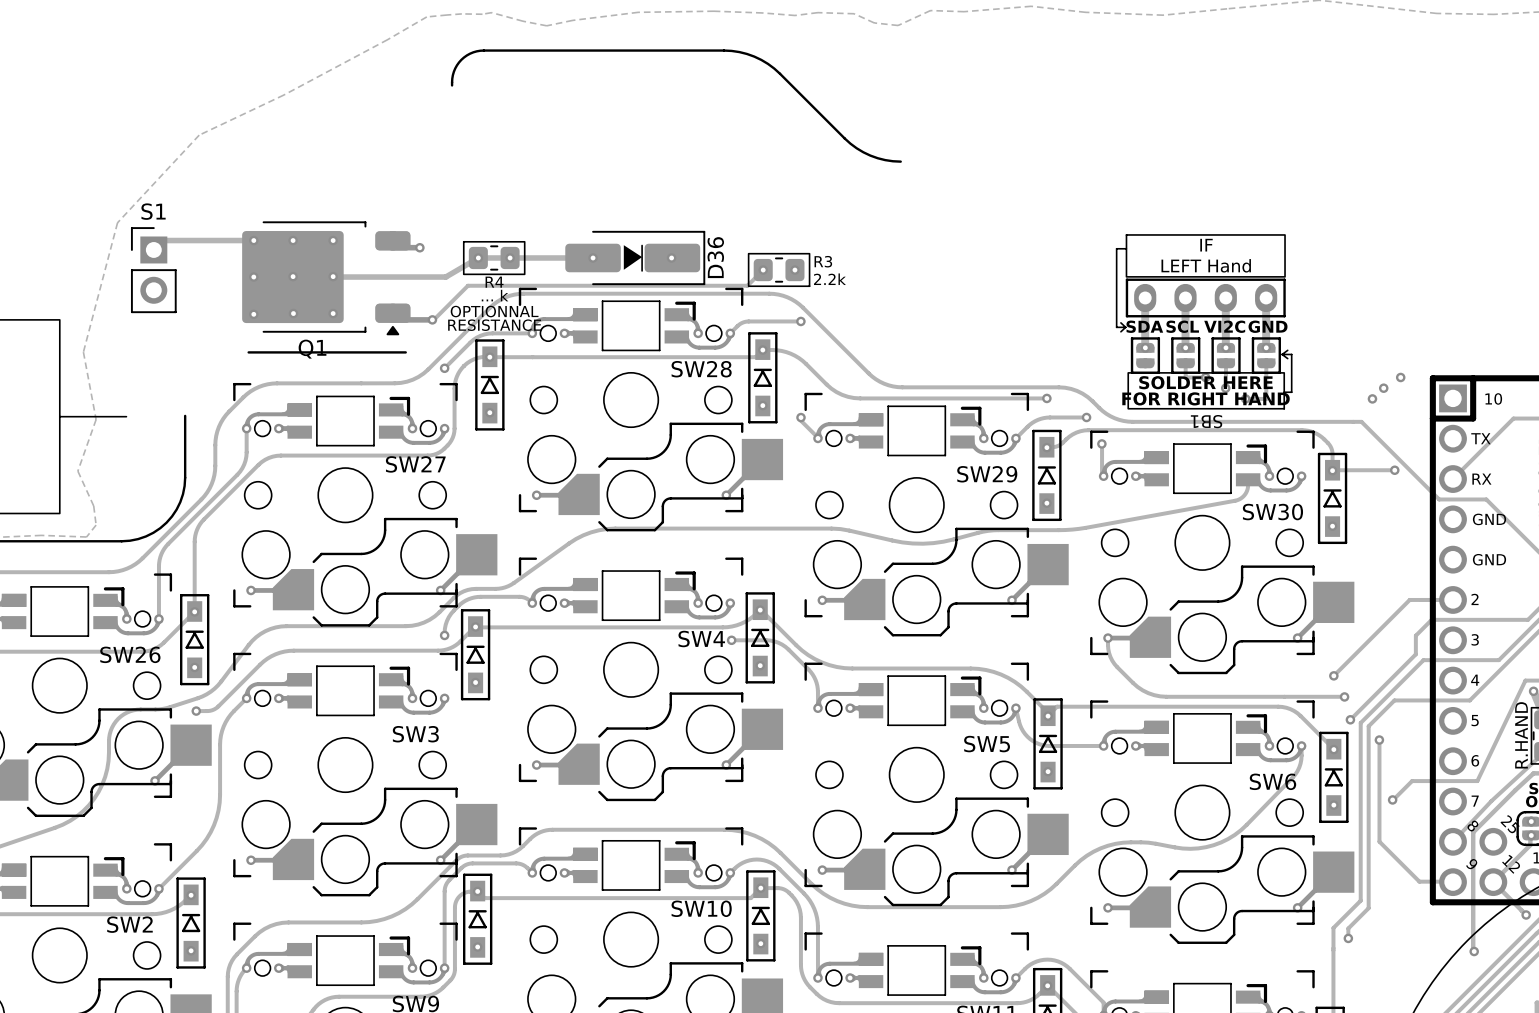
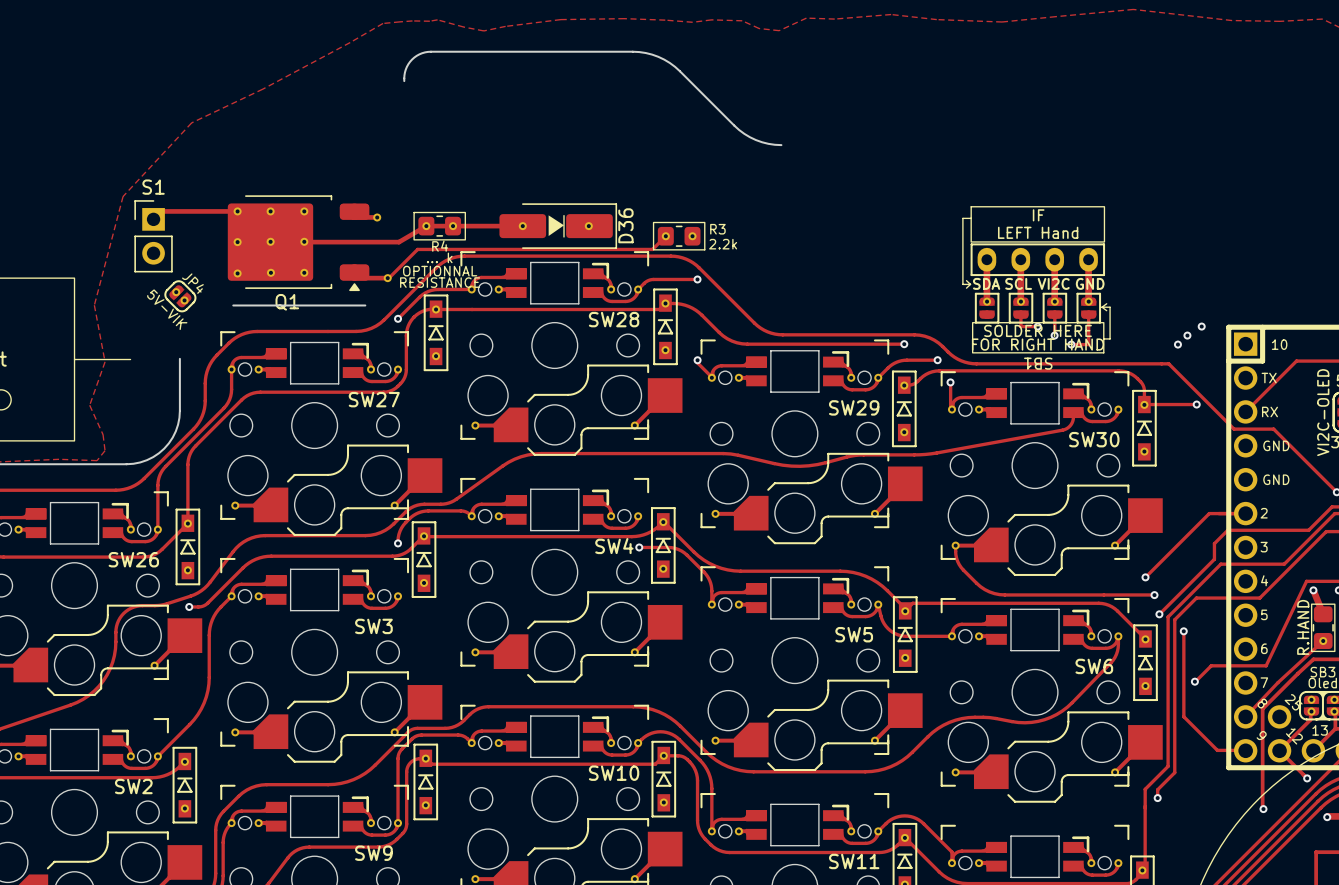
JP4: none -> 5V-VIK (180, 296)

